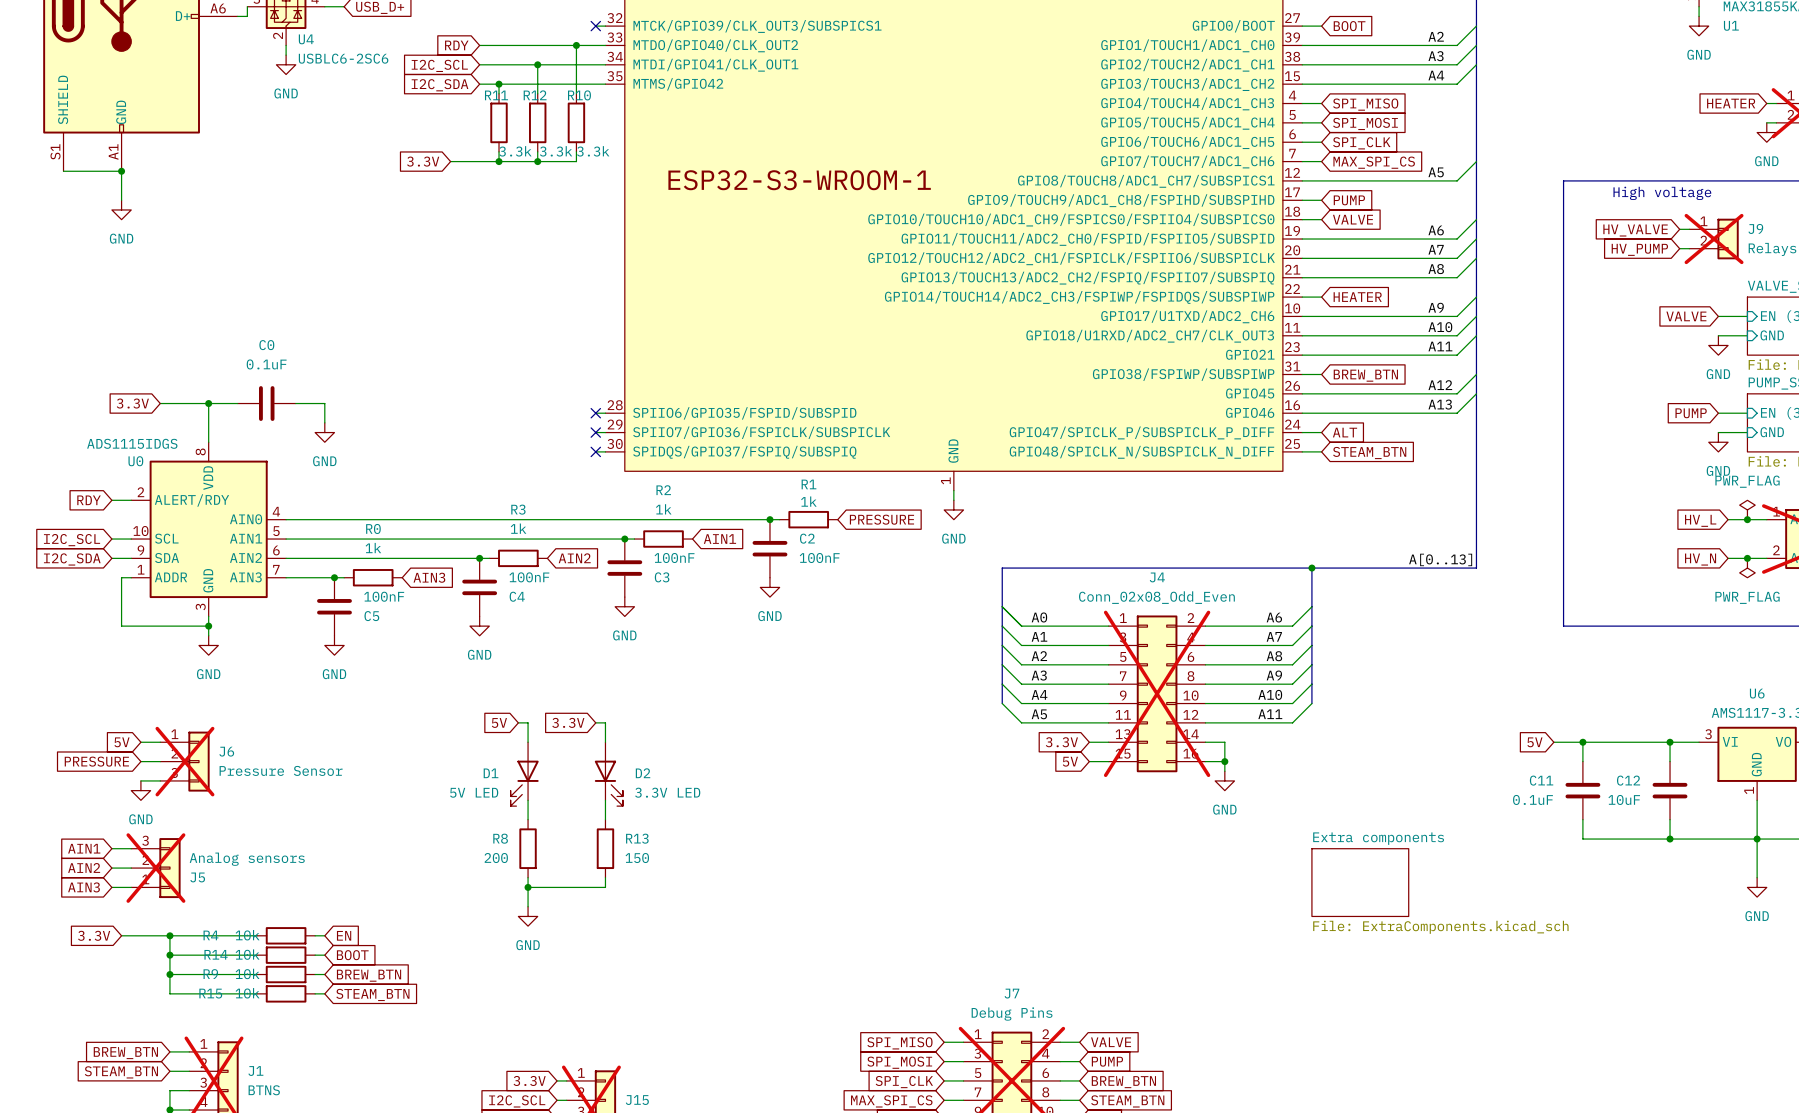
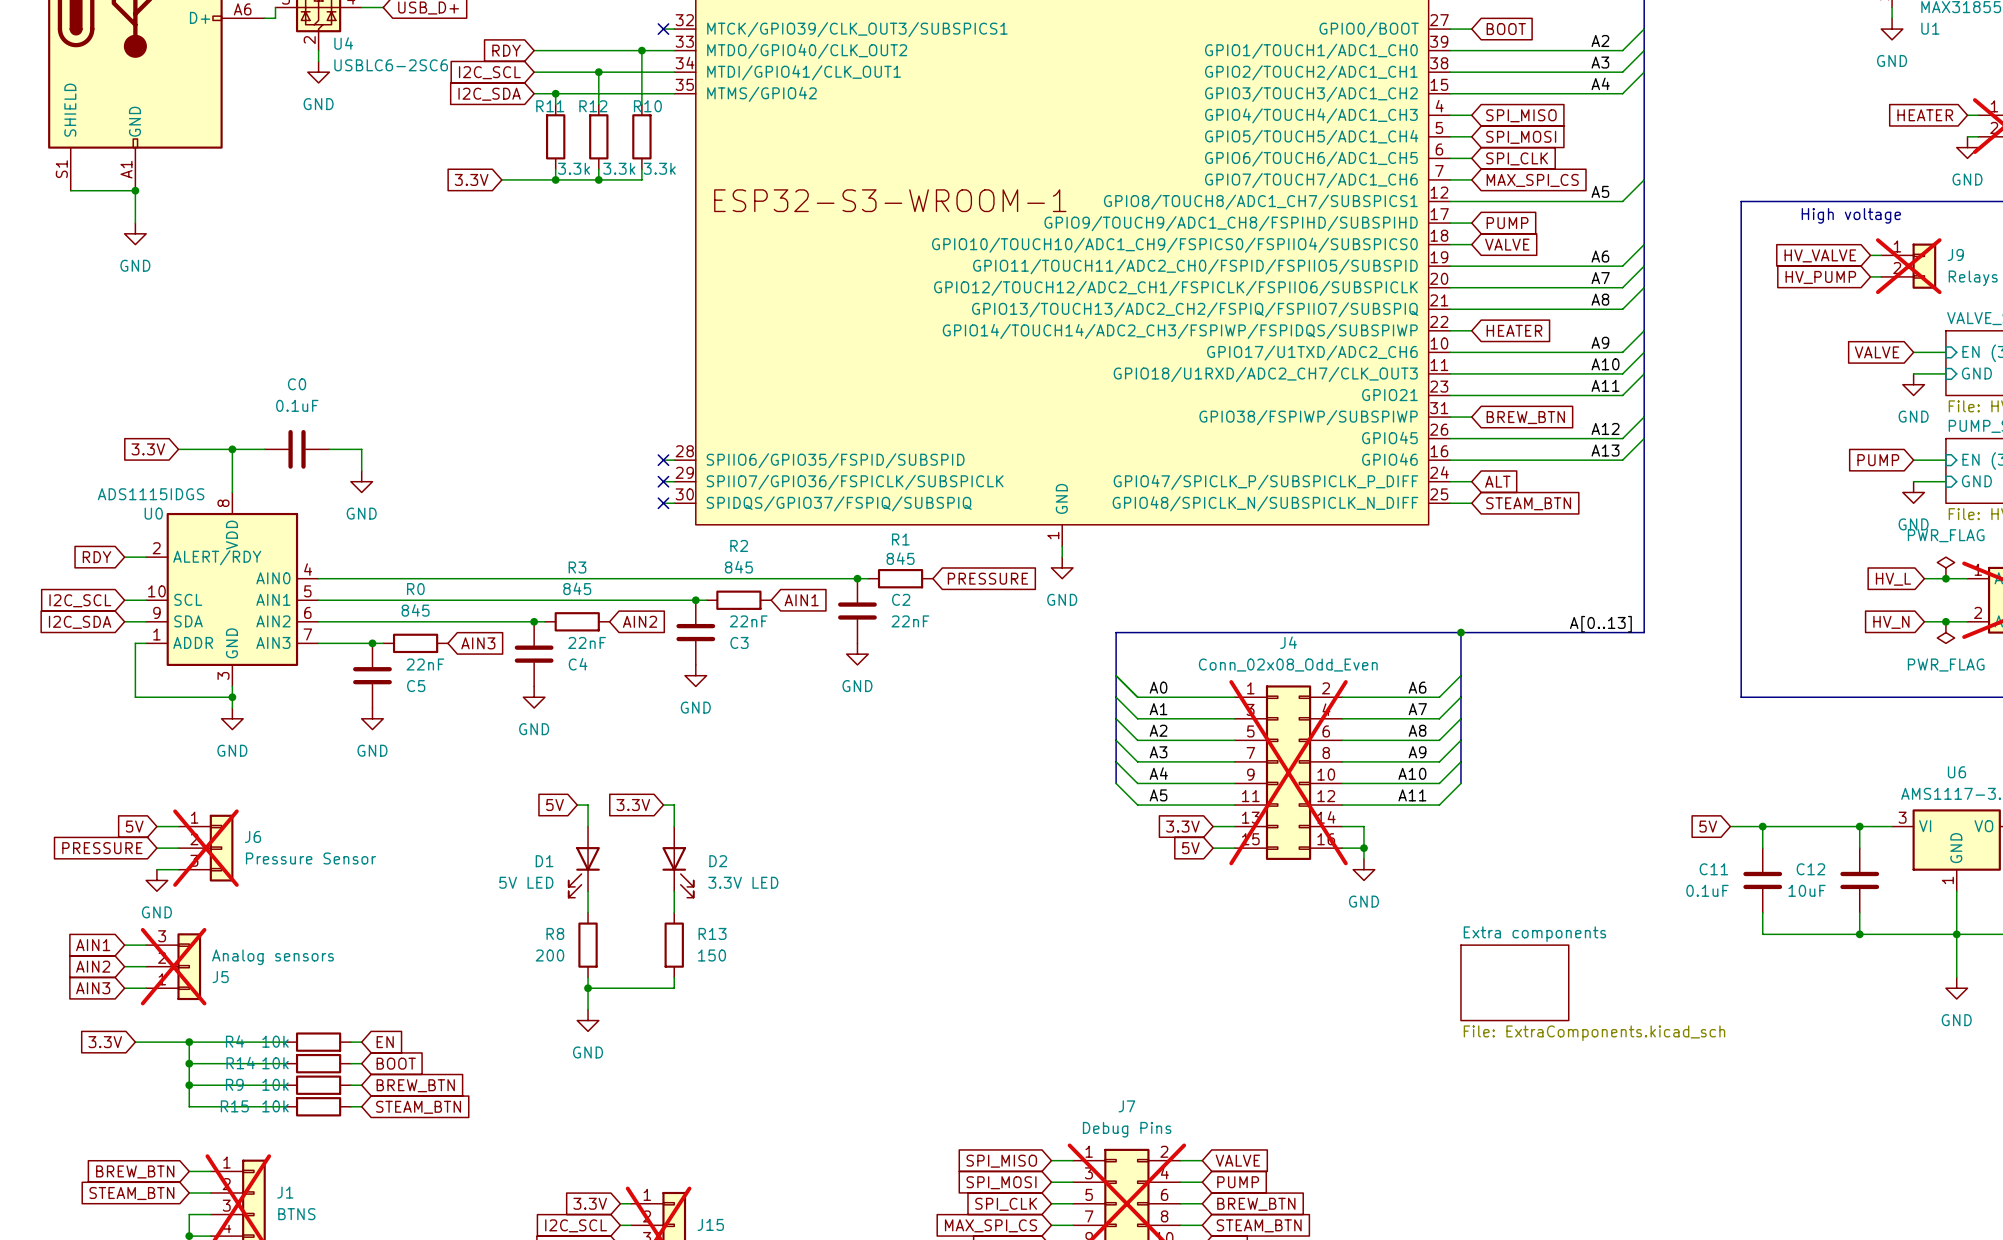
R1 value: 1k (808, 501) -> 845 (900, 558)
R2 value: 1k (663, 509) -> 845 (738, 567)
R3 value: 1k (518, 528) -> 845 (577, 588)
R0 value: 1k (373, 548) -> 845 (415, 610)
C3 value: 100nF (674, 558) -> 22nF (748, 621)
C2 value: 100nF (819, 558) -> 22nF (910, 621)
C4 value: 100nF (529, 577) -> 22nF (587, 642)
C5 value: 100nF (384, 596) -> 22nF (425, 664)

